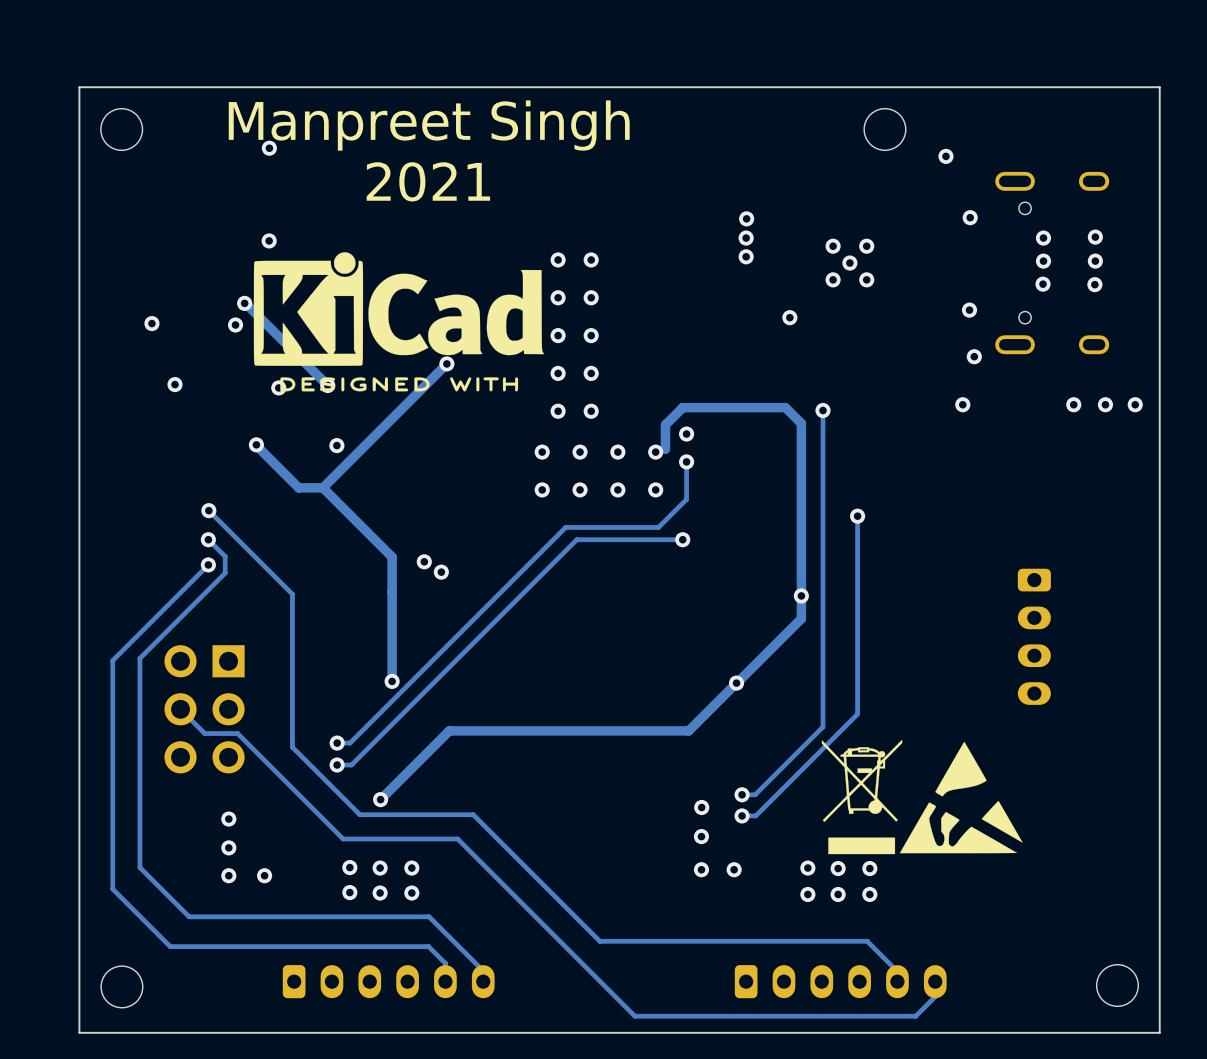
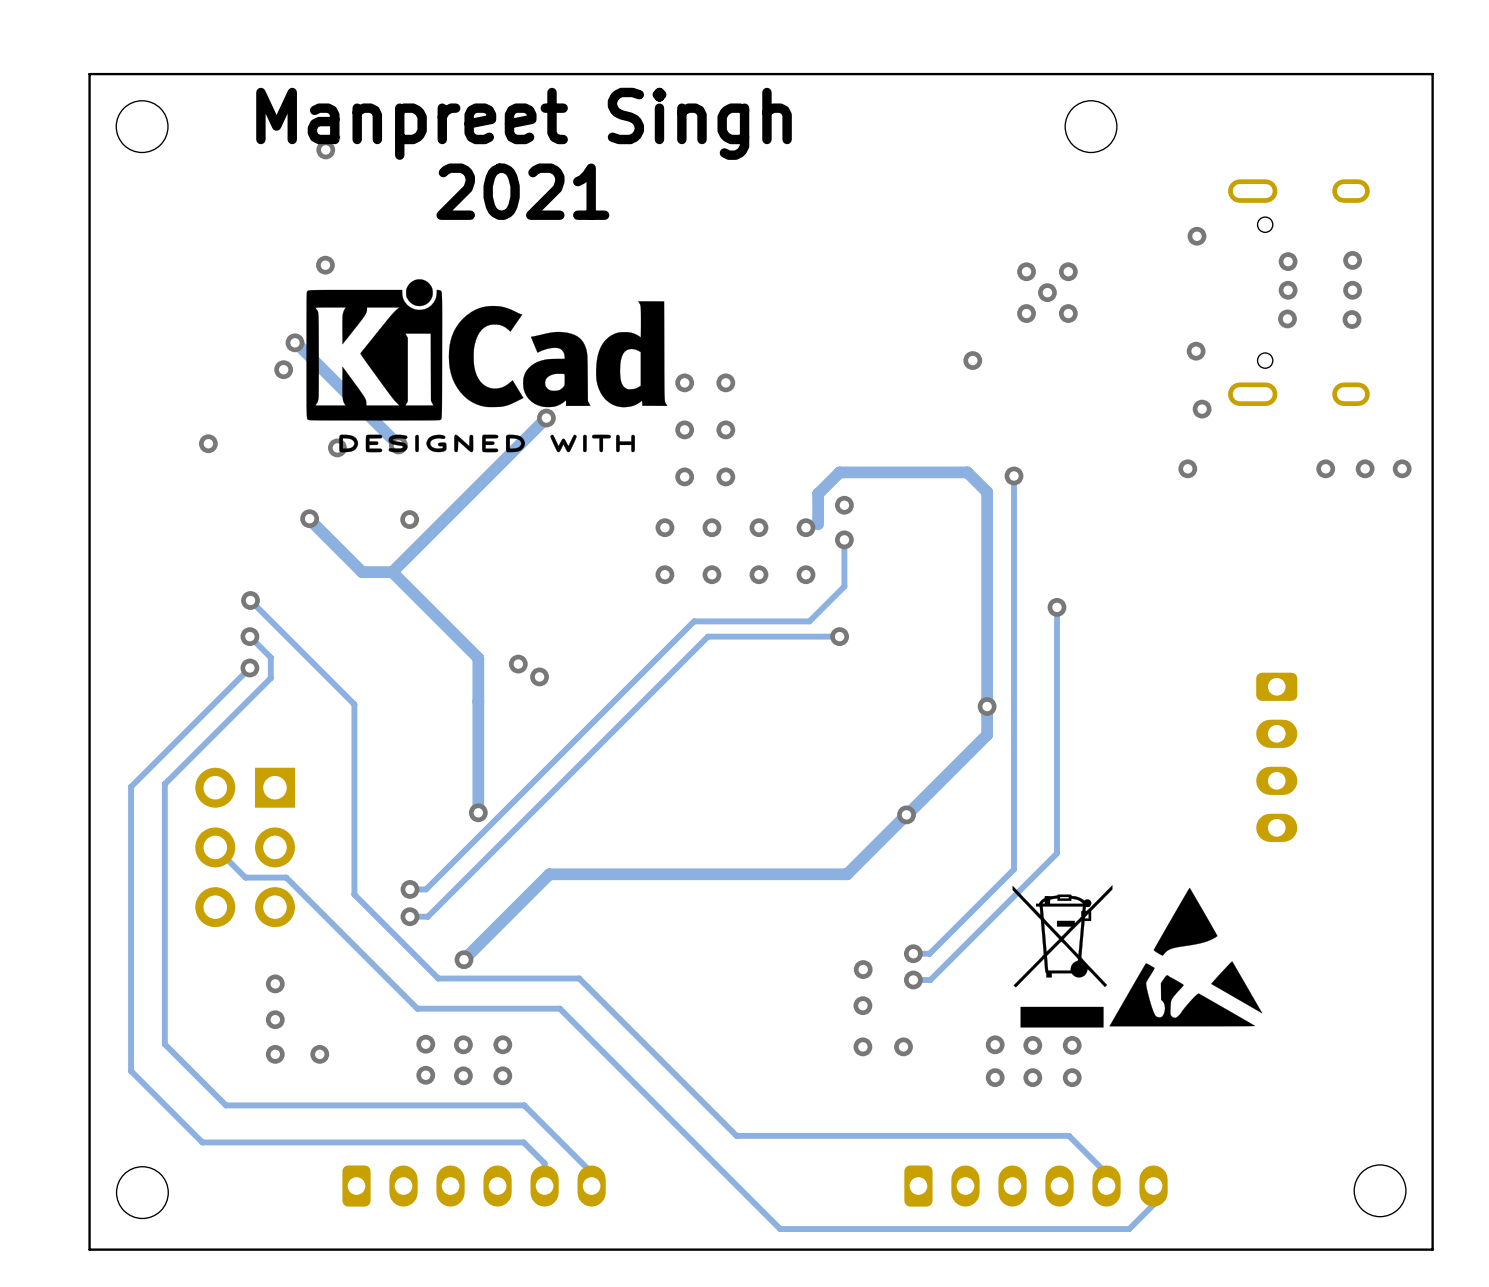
via: (945, 156) -> none
via: (746, 218) -> none
via: (746, 238) -> none
via: (746, 256) -> none
via: (558, 259) -> none
via: (591, 259) -> none
via: (558, 297) -> none
via: (591, 297) -> none
via: (151, 323) -> none

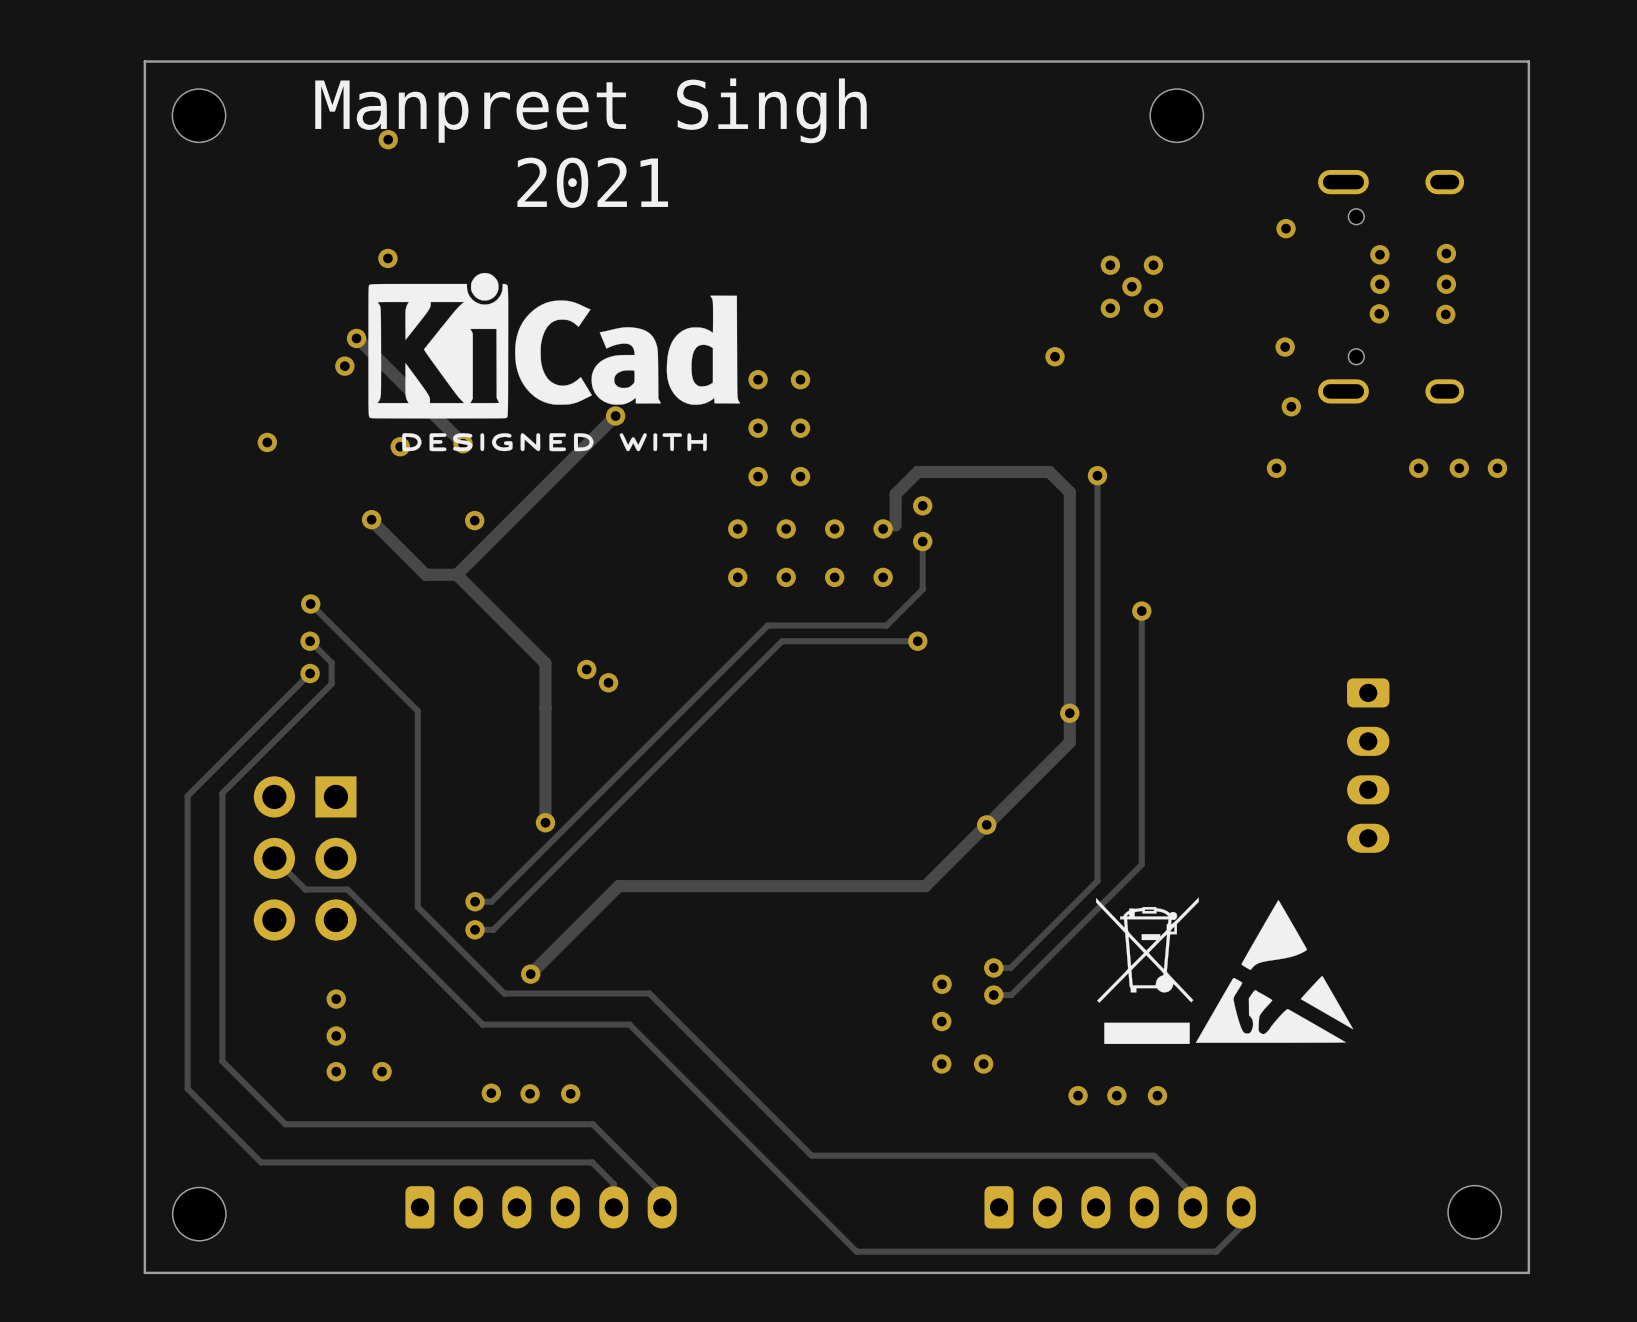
via: (425, 1044) -> none
via: (463, 1044) -> none
via: (502, 1044) -> none
via: (995, 1044) -> none
via: (1032, 1045) -> none
via: (1072, 1045) -> none

